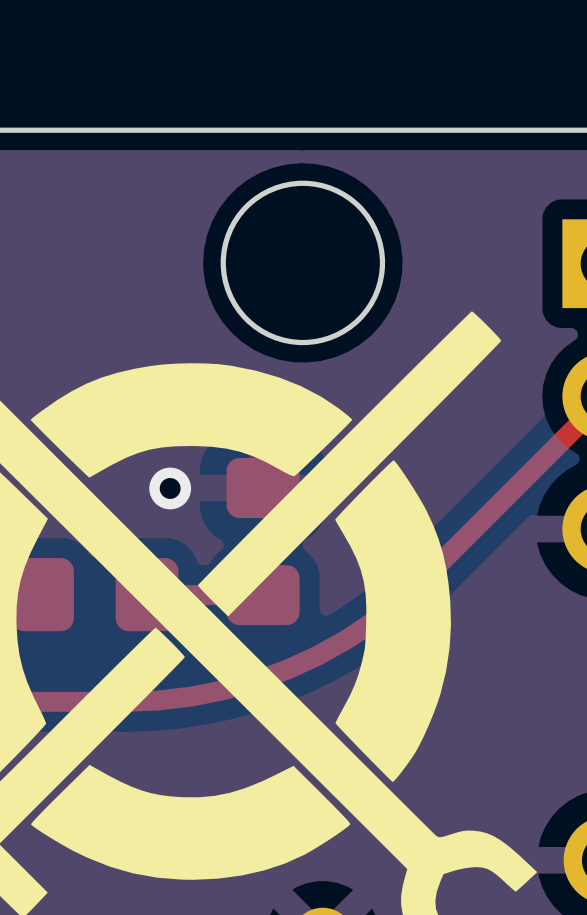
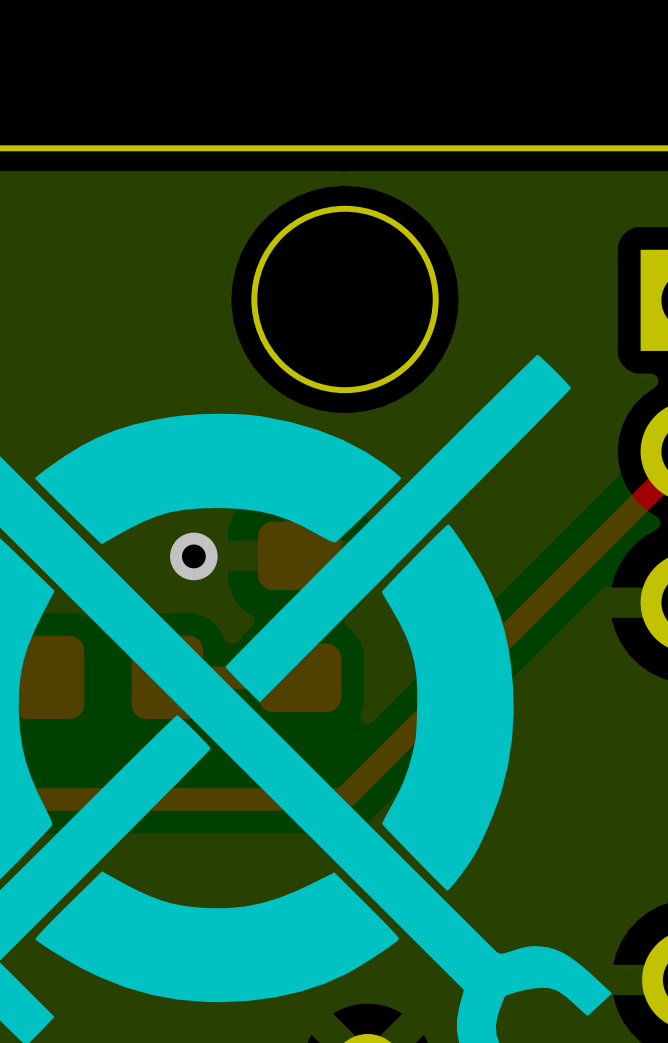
top track: (426, 576) (401, 599) (347, 639) (287, 669) (256, 680) (191, 696) (124, 701) -> (485, 657) (343, 799) (142, 799)

